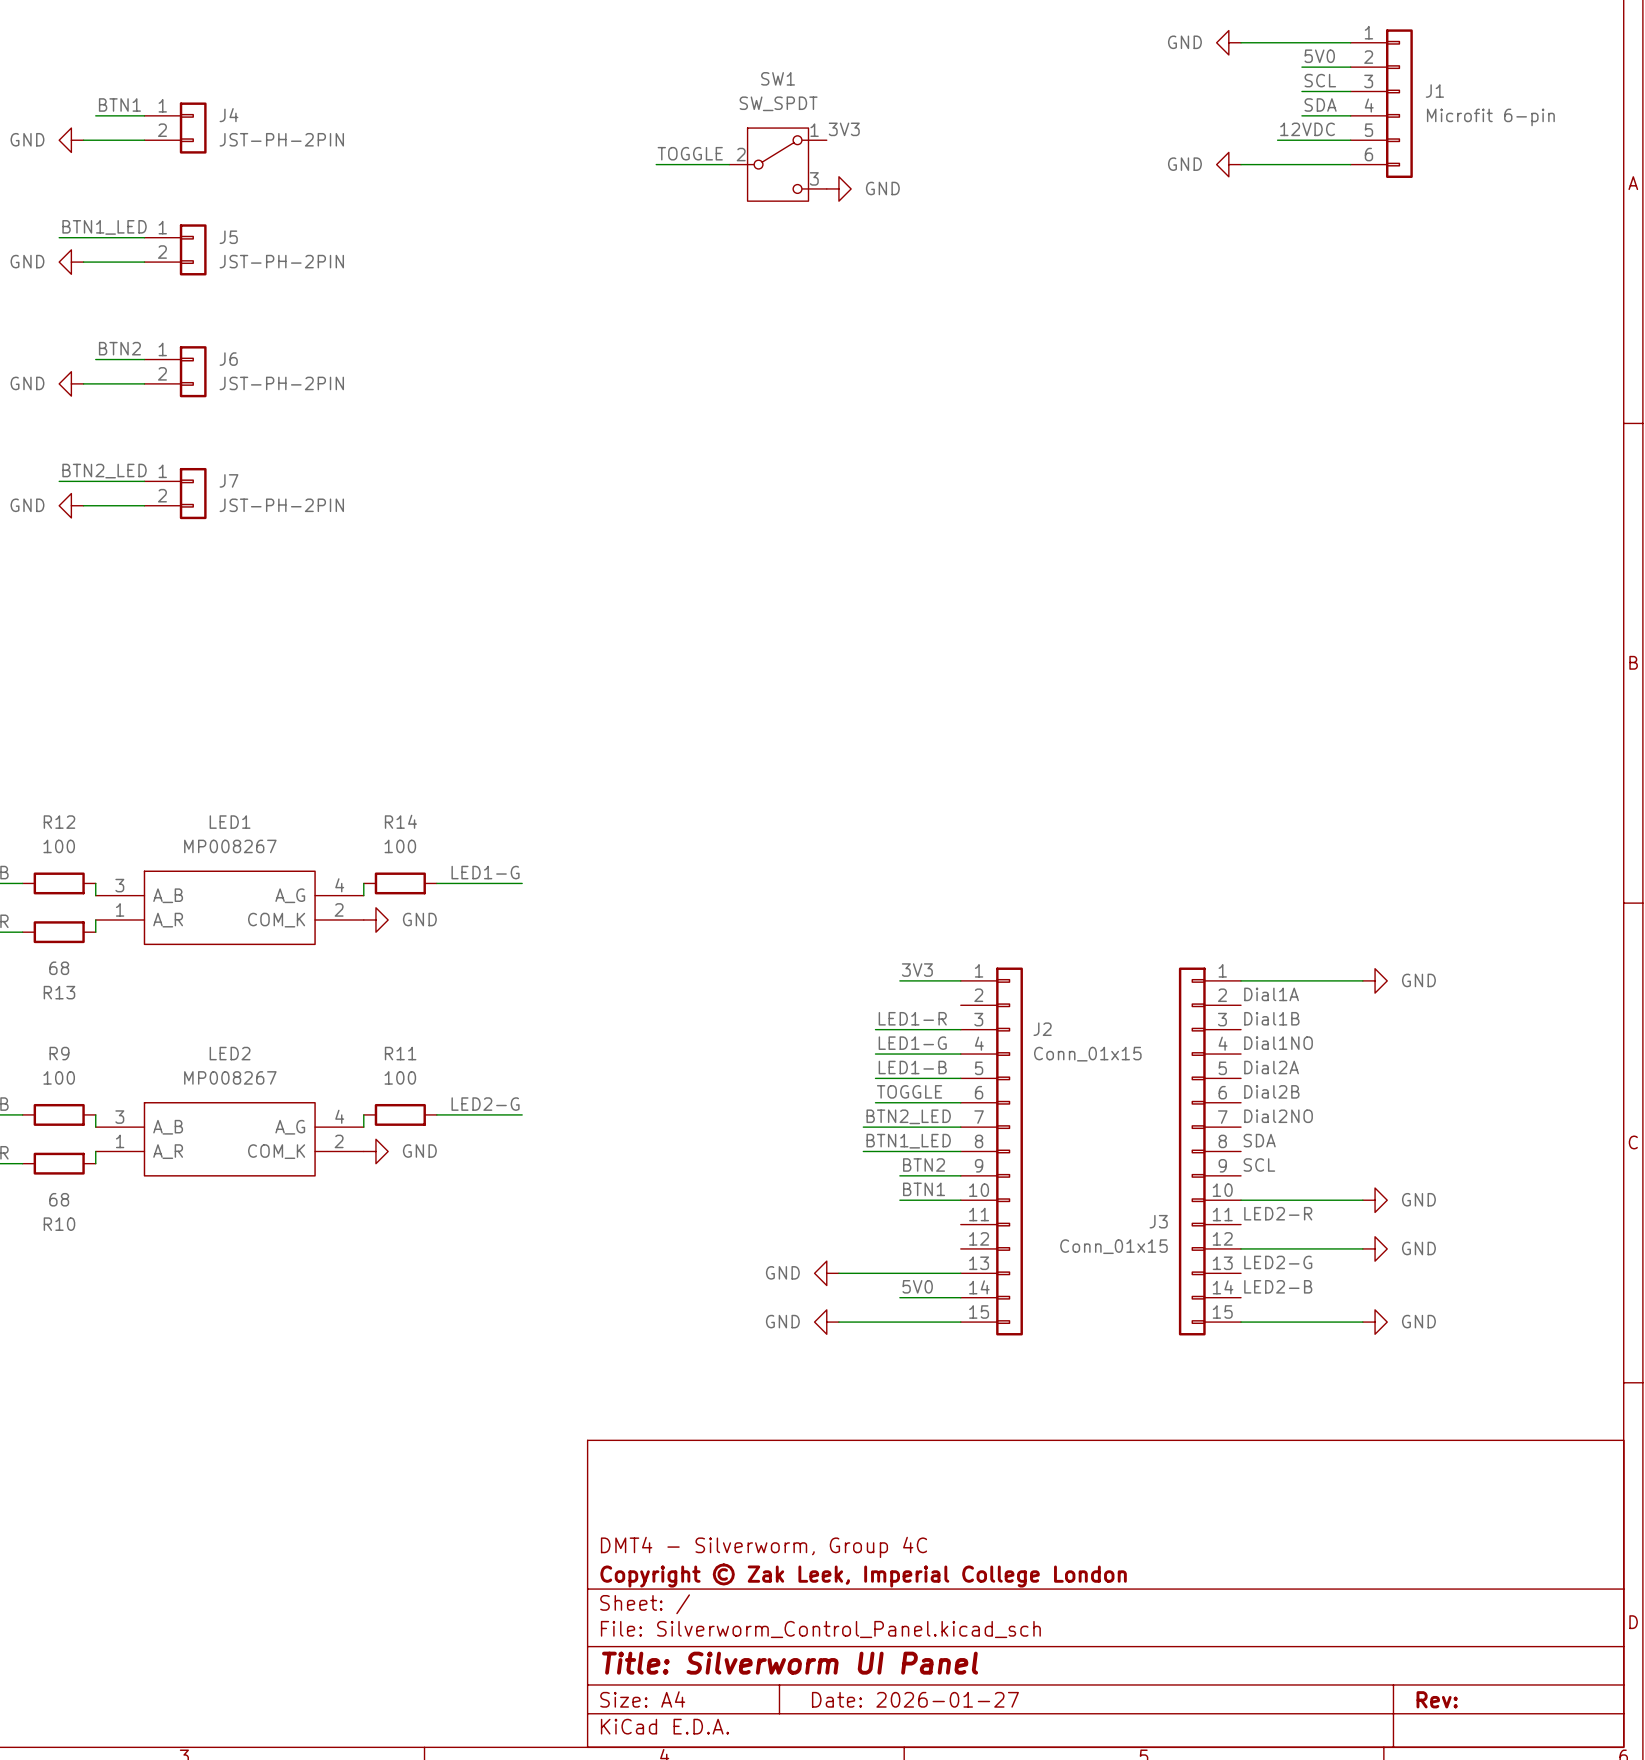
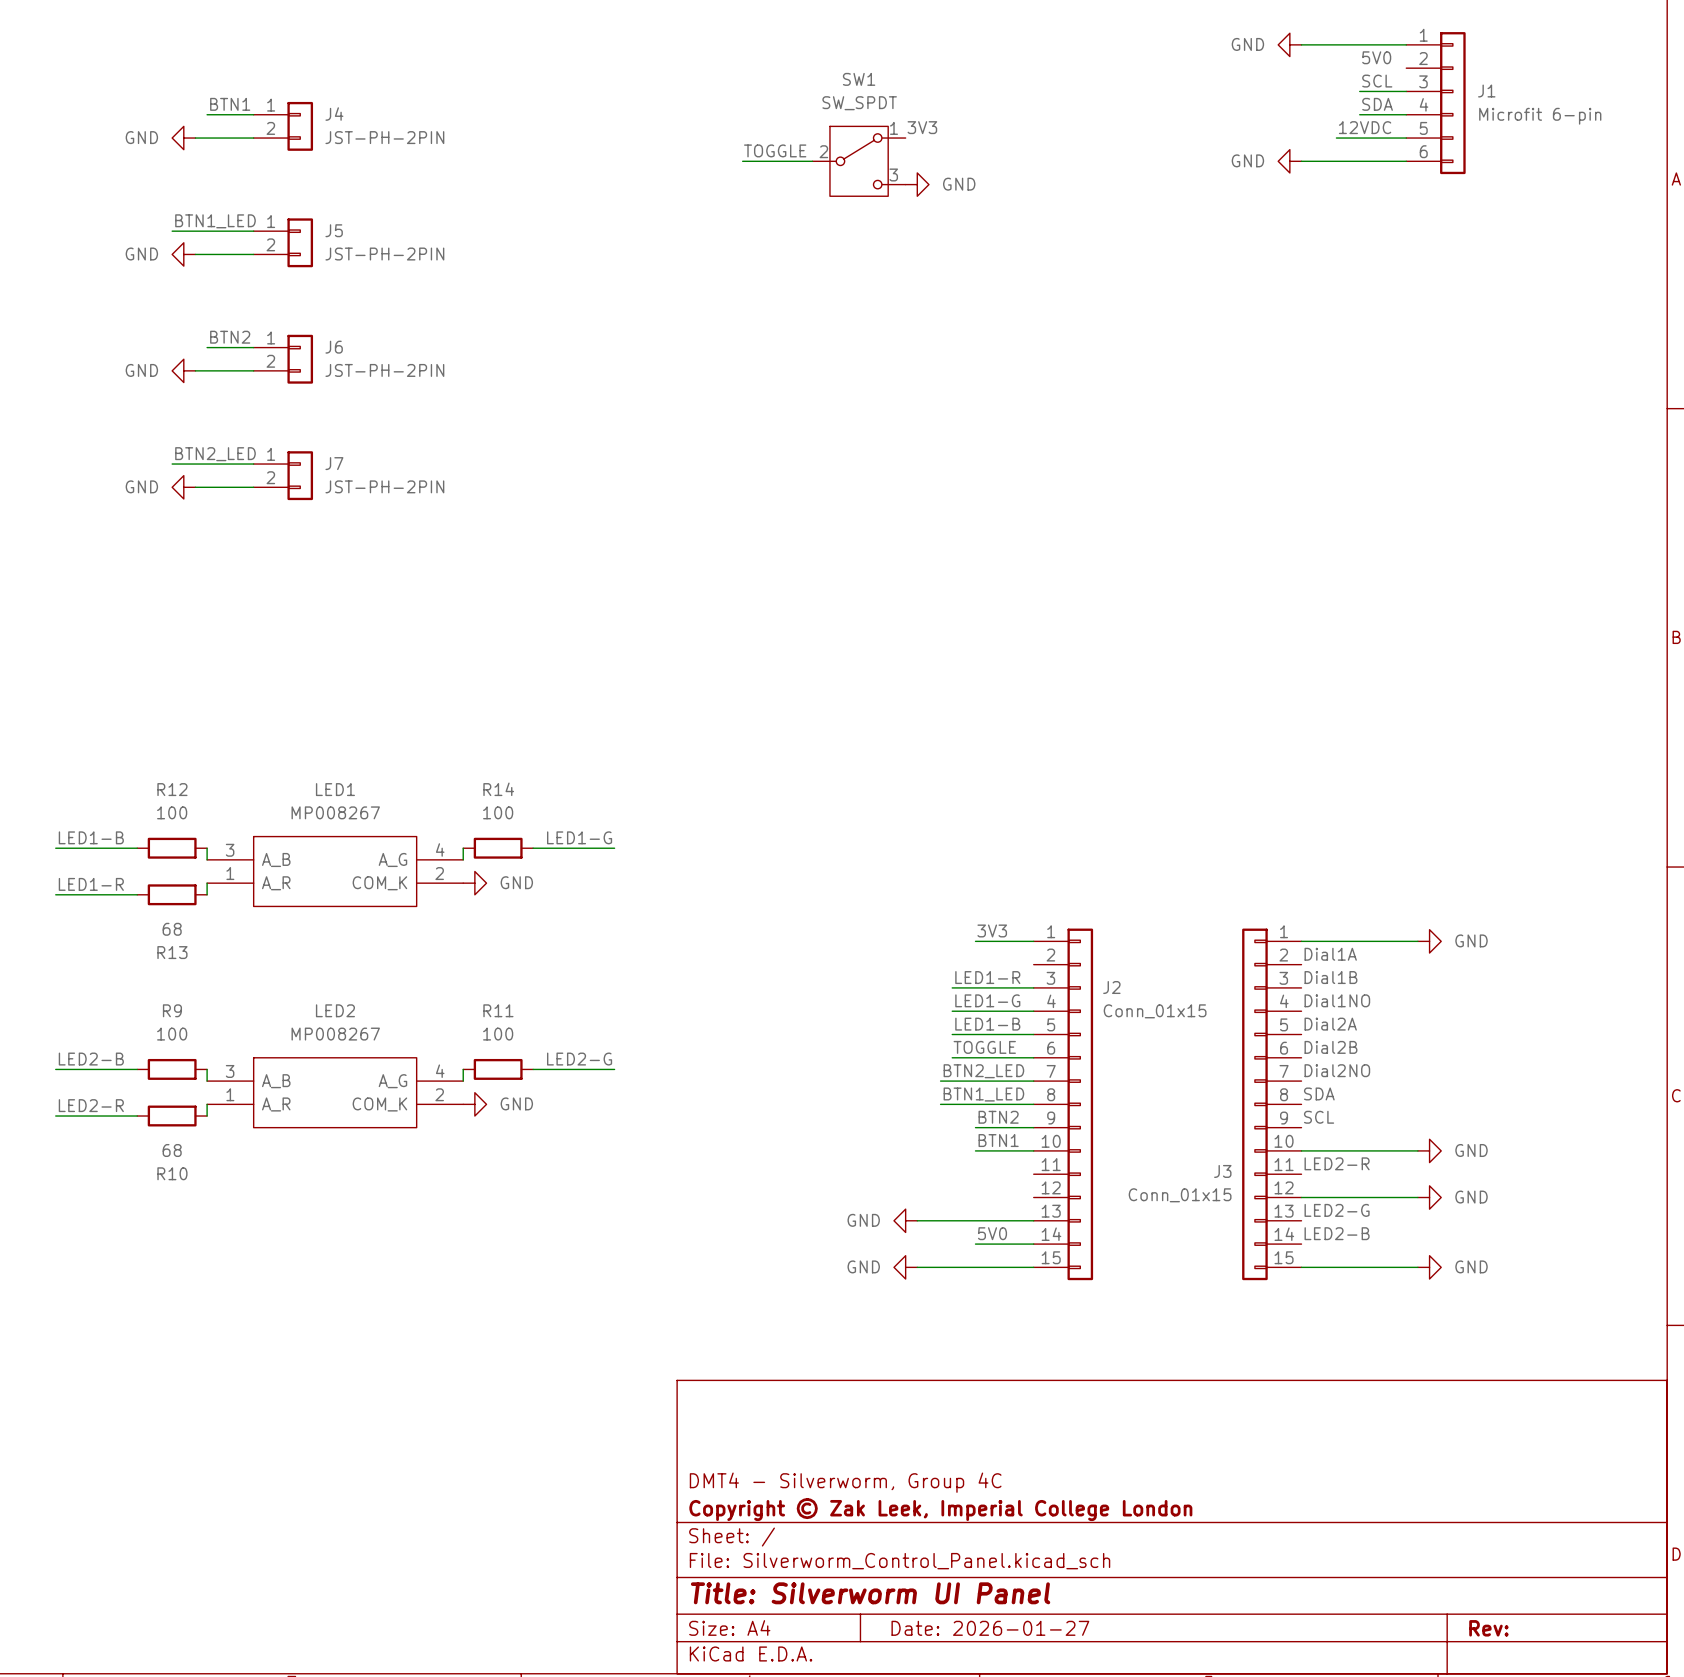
wire: (1301, 67) (1350, 67) -> none

